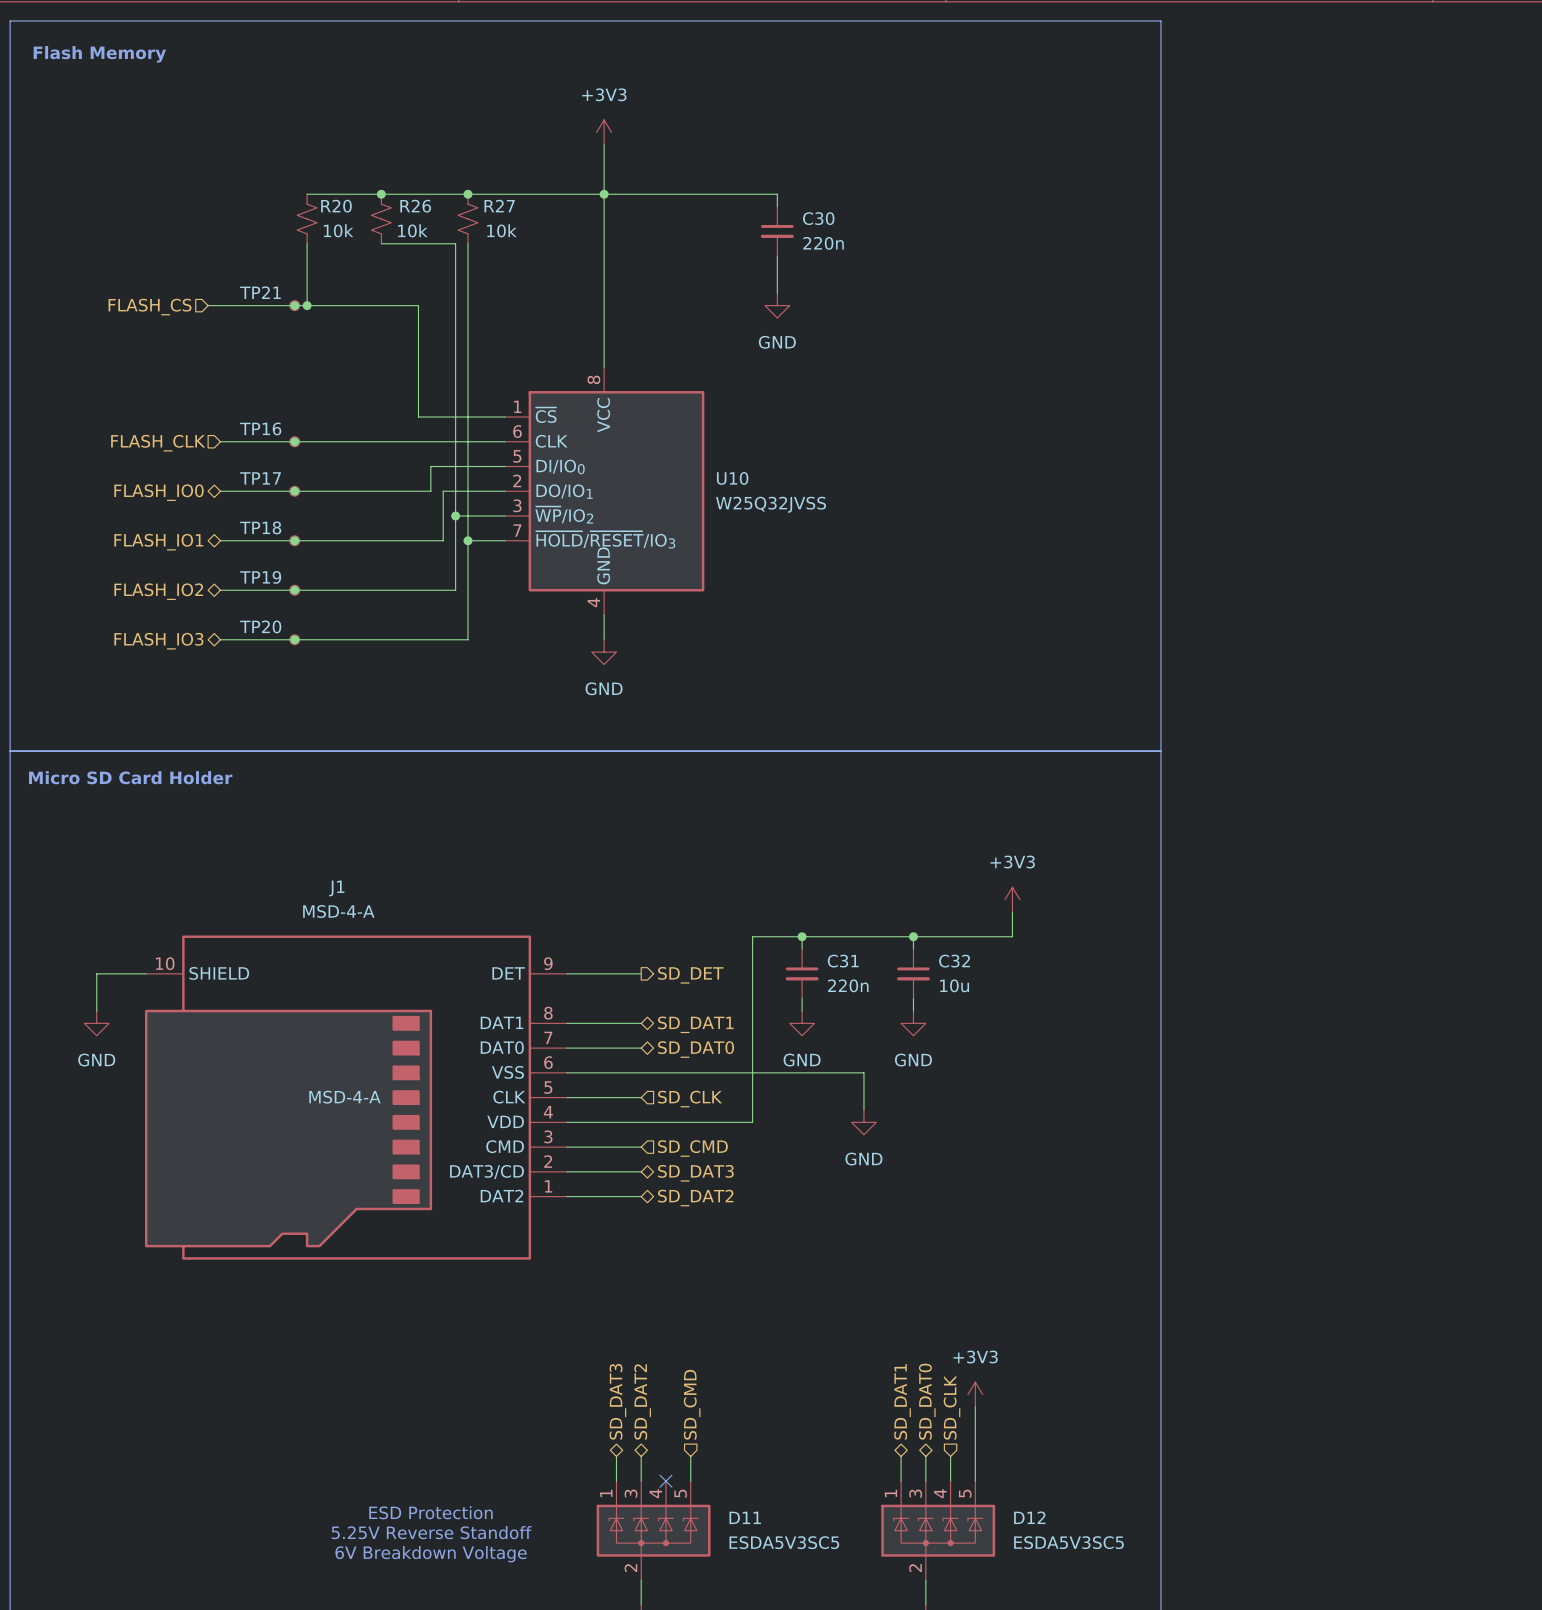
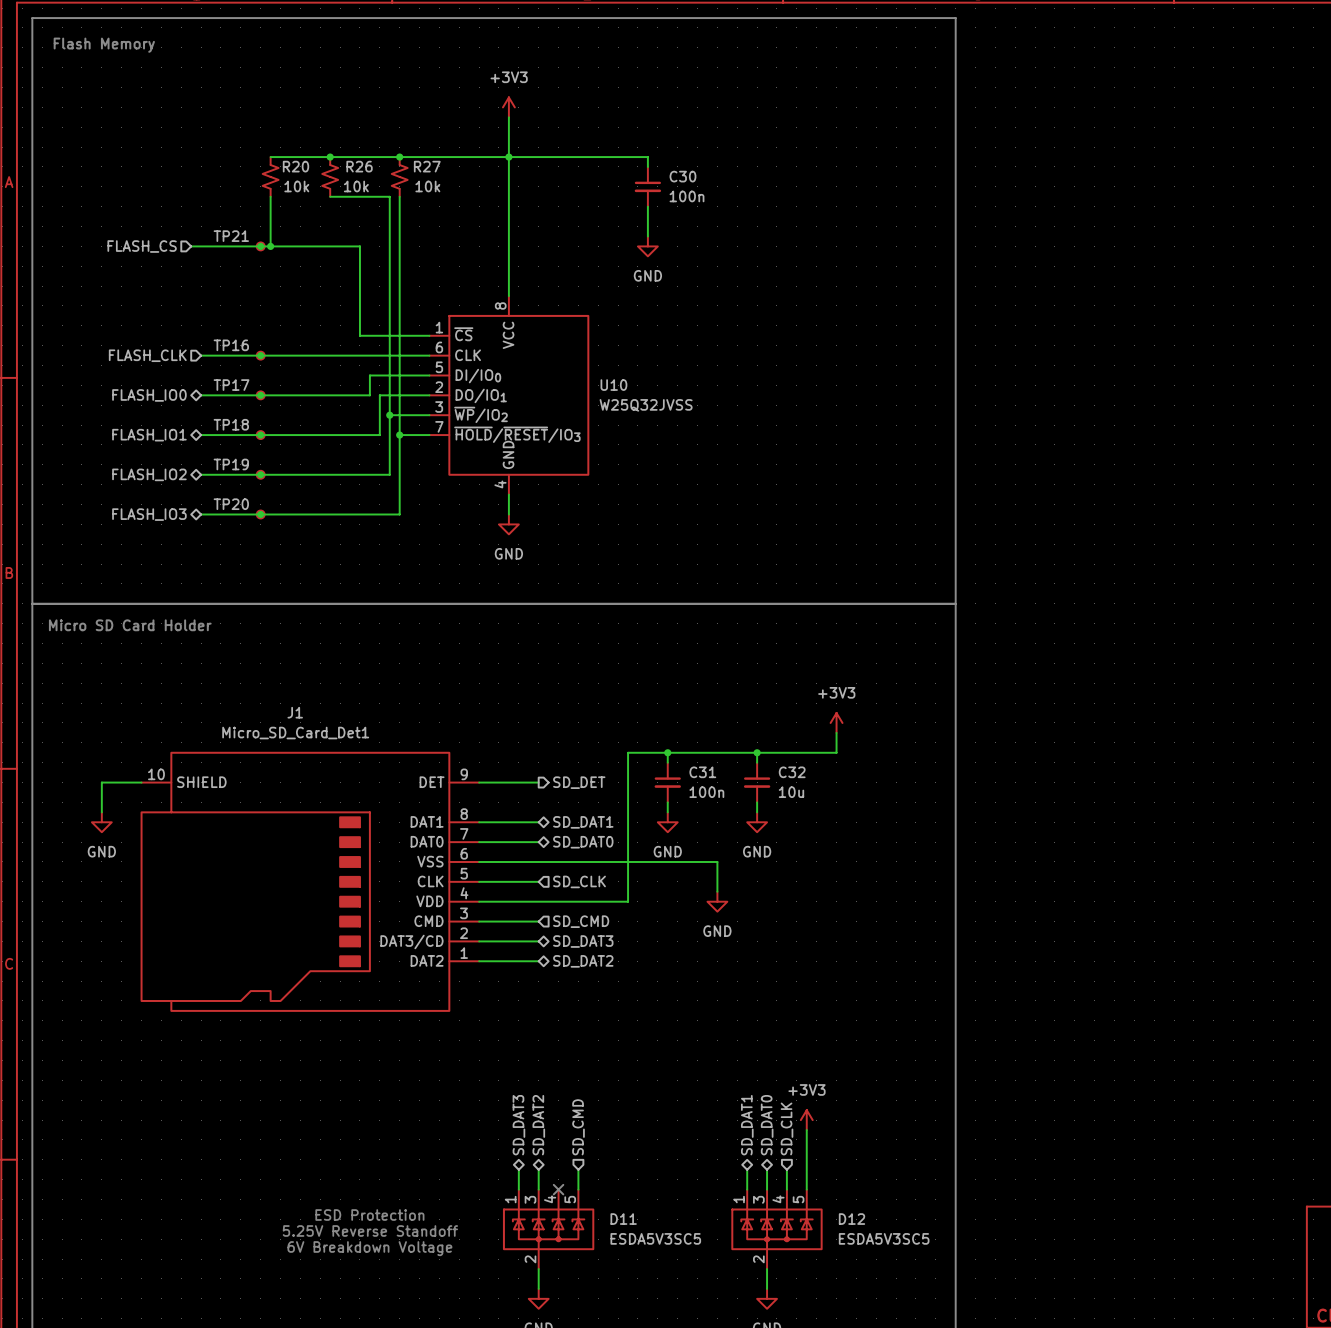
C30 value: 220n (823, 243) -> 100n (686, 196)
J1 value: MSD-4-A (338, 911) -> Micro_SD_Card_Det1 (295, 733)
C31 value: 220n (848, 985) -> 100n (706, 792)
J1 text: MSD-4-A (345, 1097) -> none

